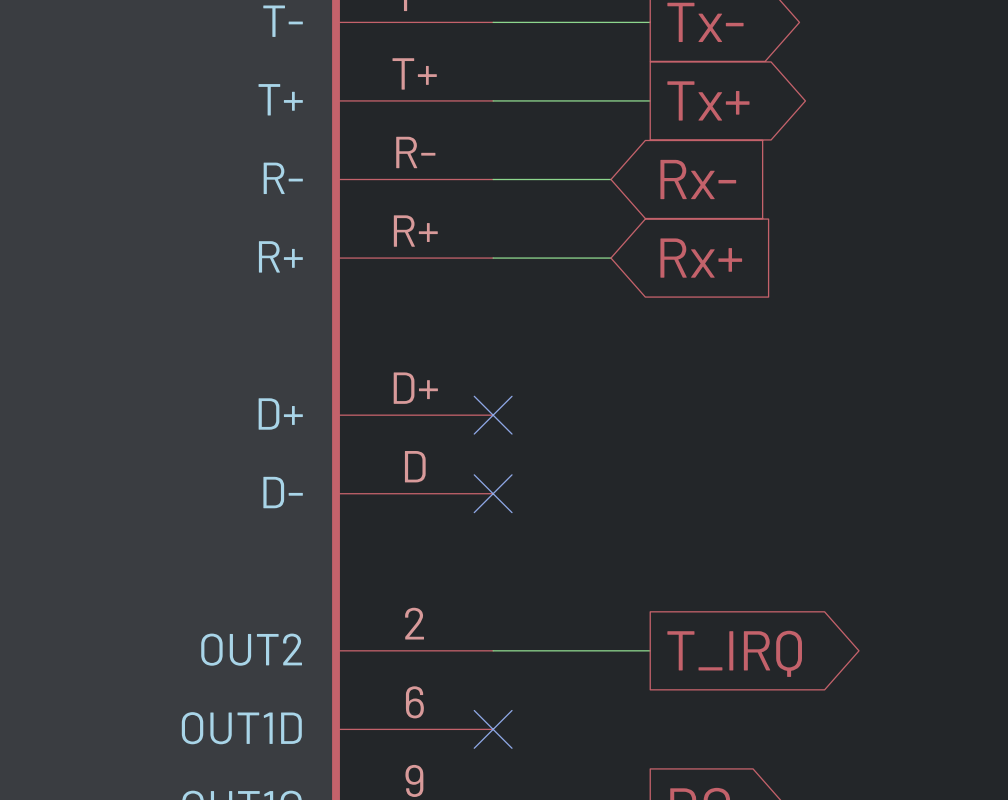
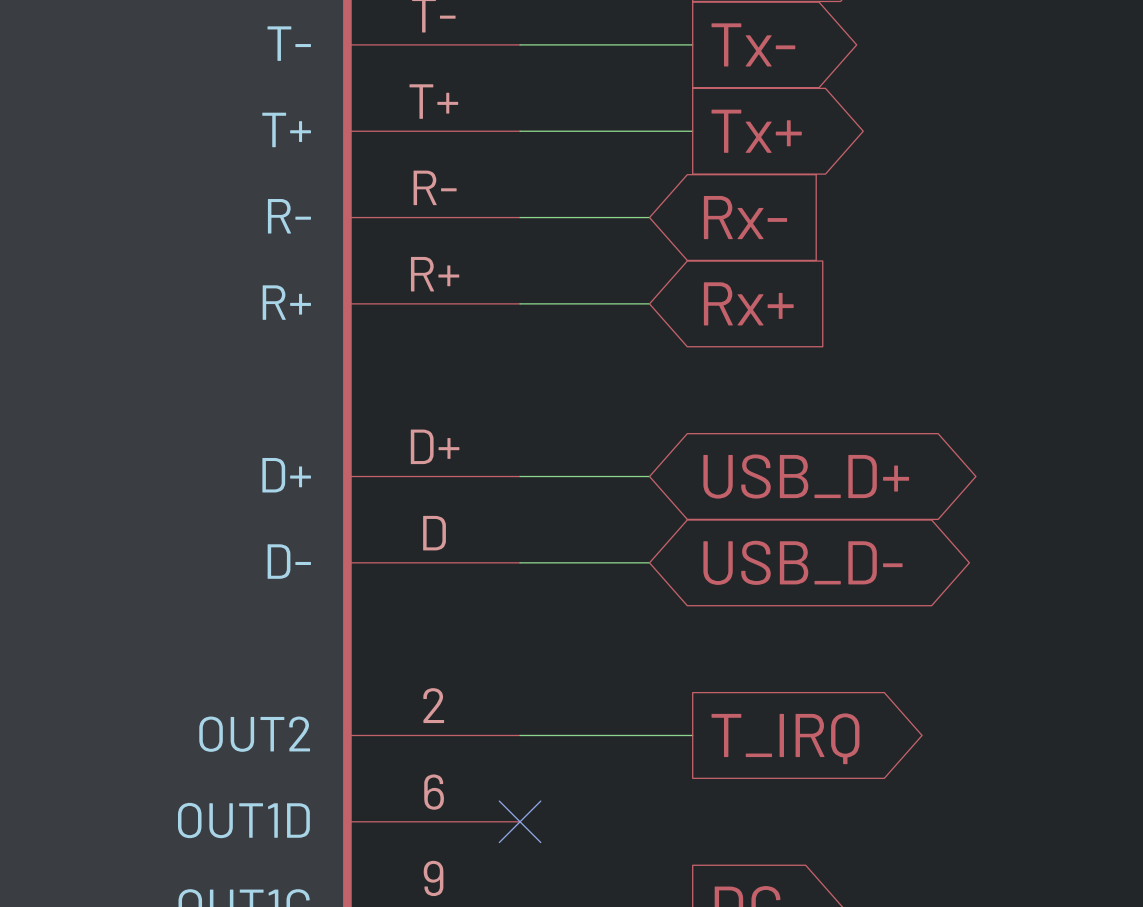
wire: none -> (520, 476) (649, 476)
no-connect mark: (493, 415) -> none
global label: none -> USB_D+ (806, 476)
wire: none -> (520, 562) (649, 562)
no-connect mark: (493, 493) -> none
global label: none -> USB_D- (802, 562)

